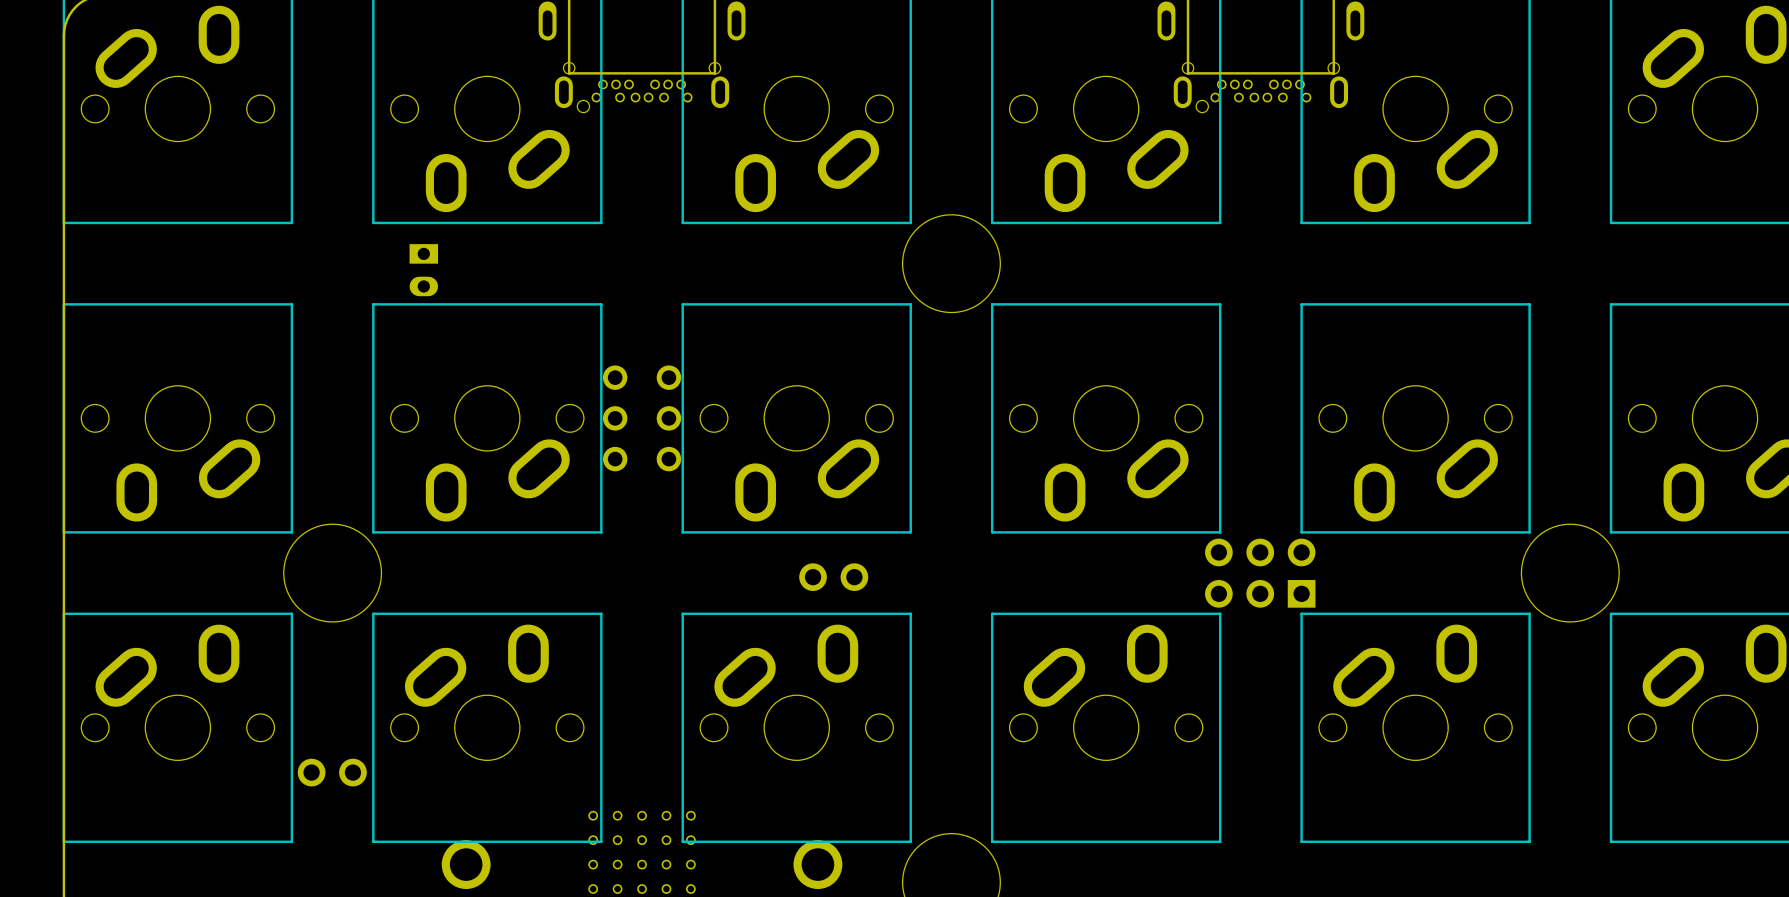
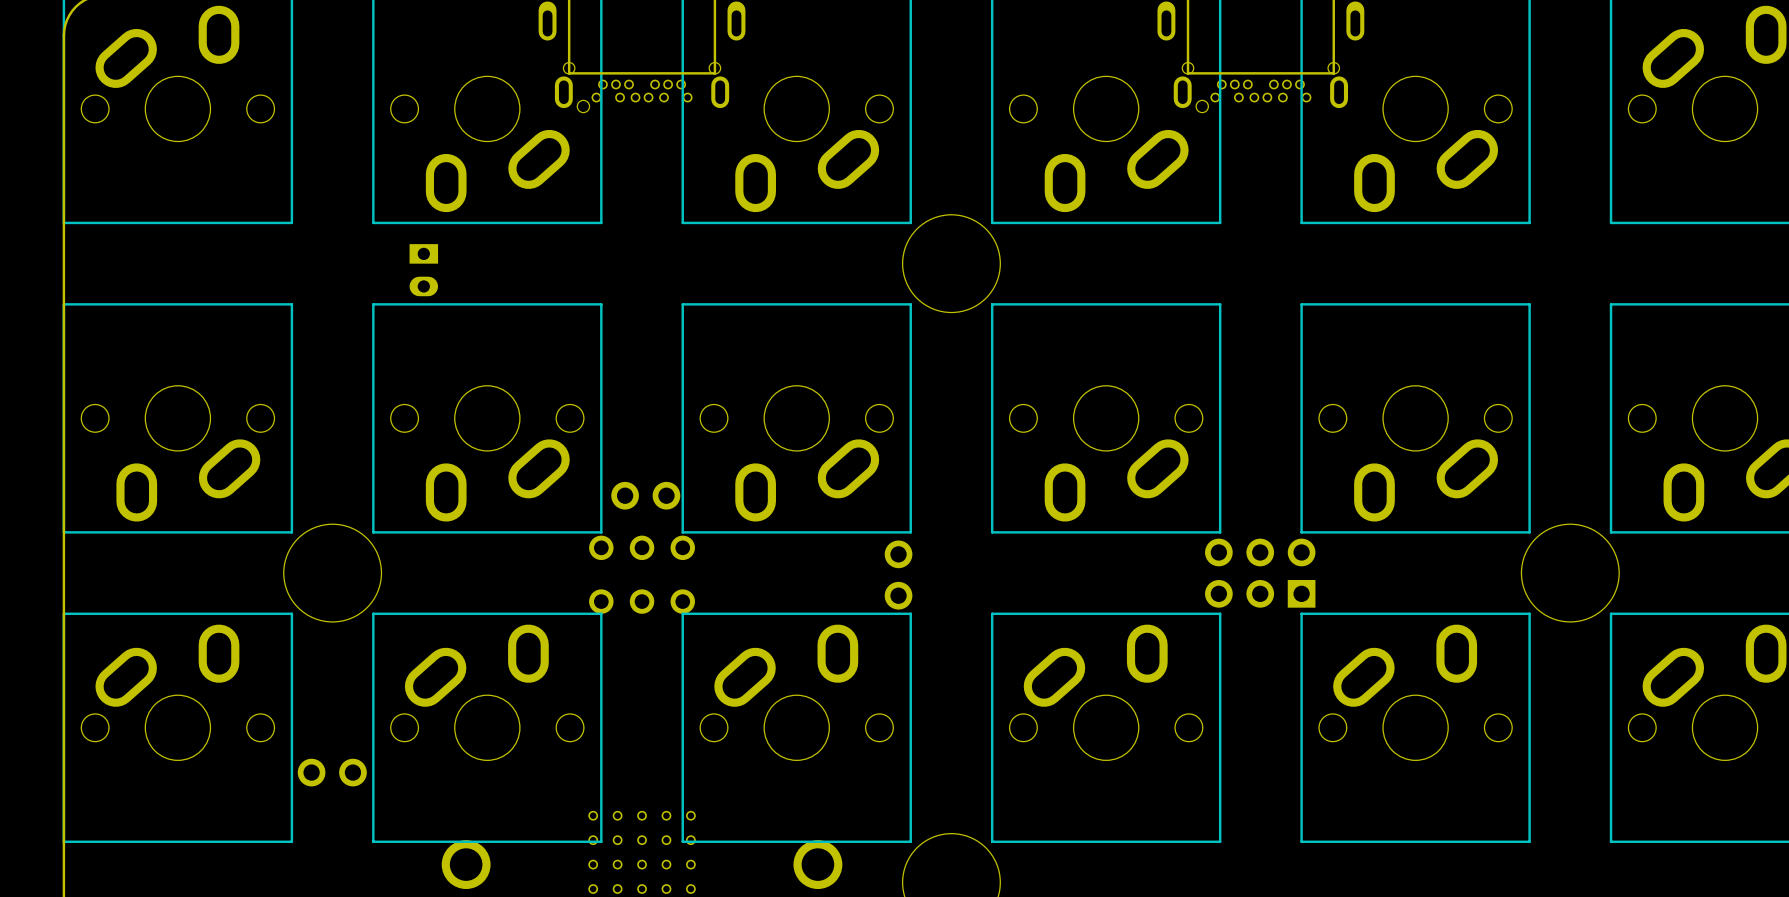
part rotation: 0° (642, 418) -> 90° clockwise (642, 574)
part position: (642, 418) -> (642, 574)
part: none -> (645, 495)
part rotation: 0° (833, 577) -> 90° clockwise (898, 575)
part position: (833, 577) -> (898, 575)

